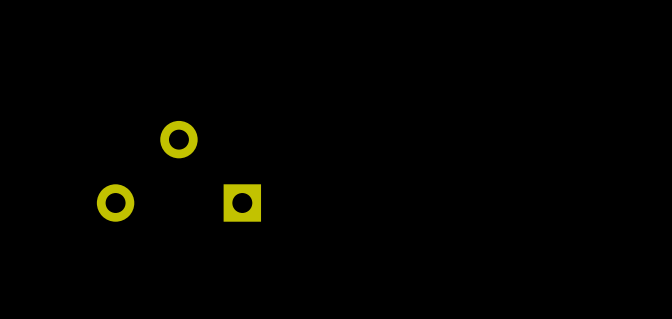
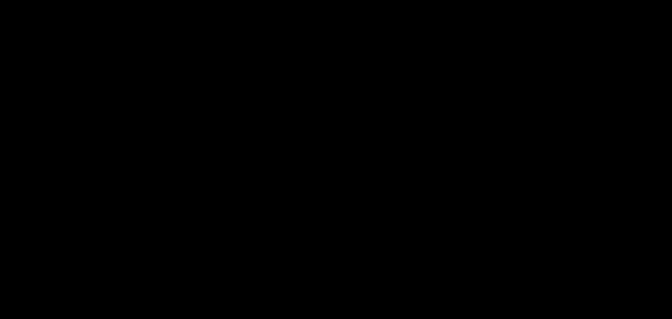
part: (178, 171) -> none

